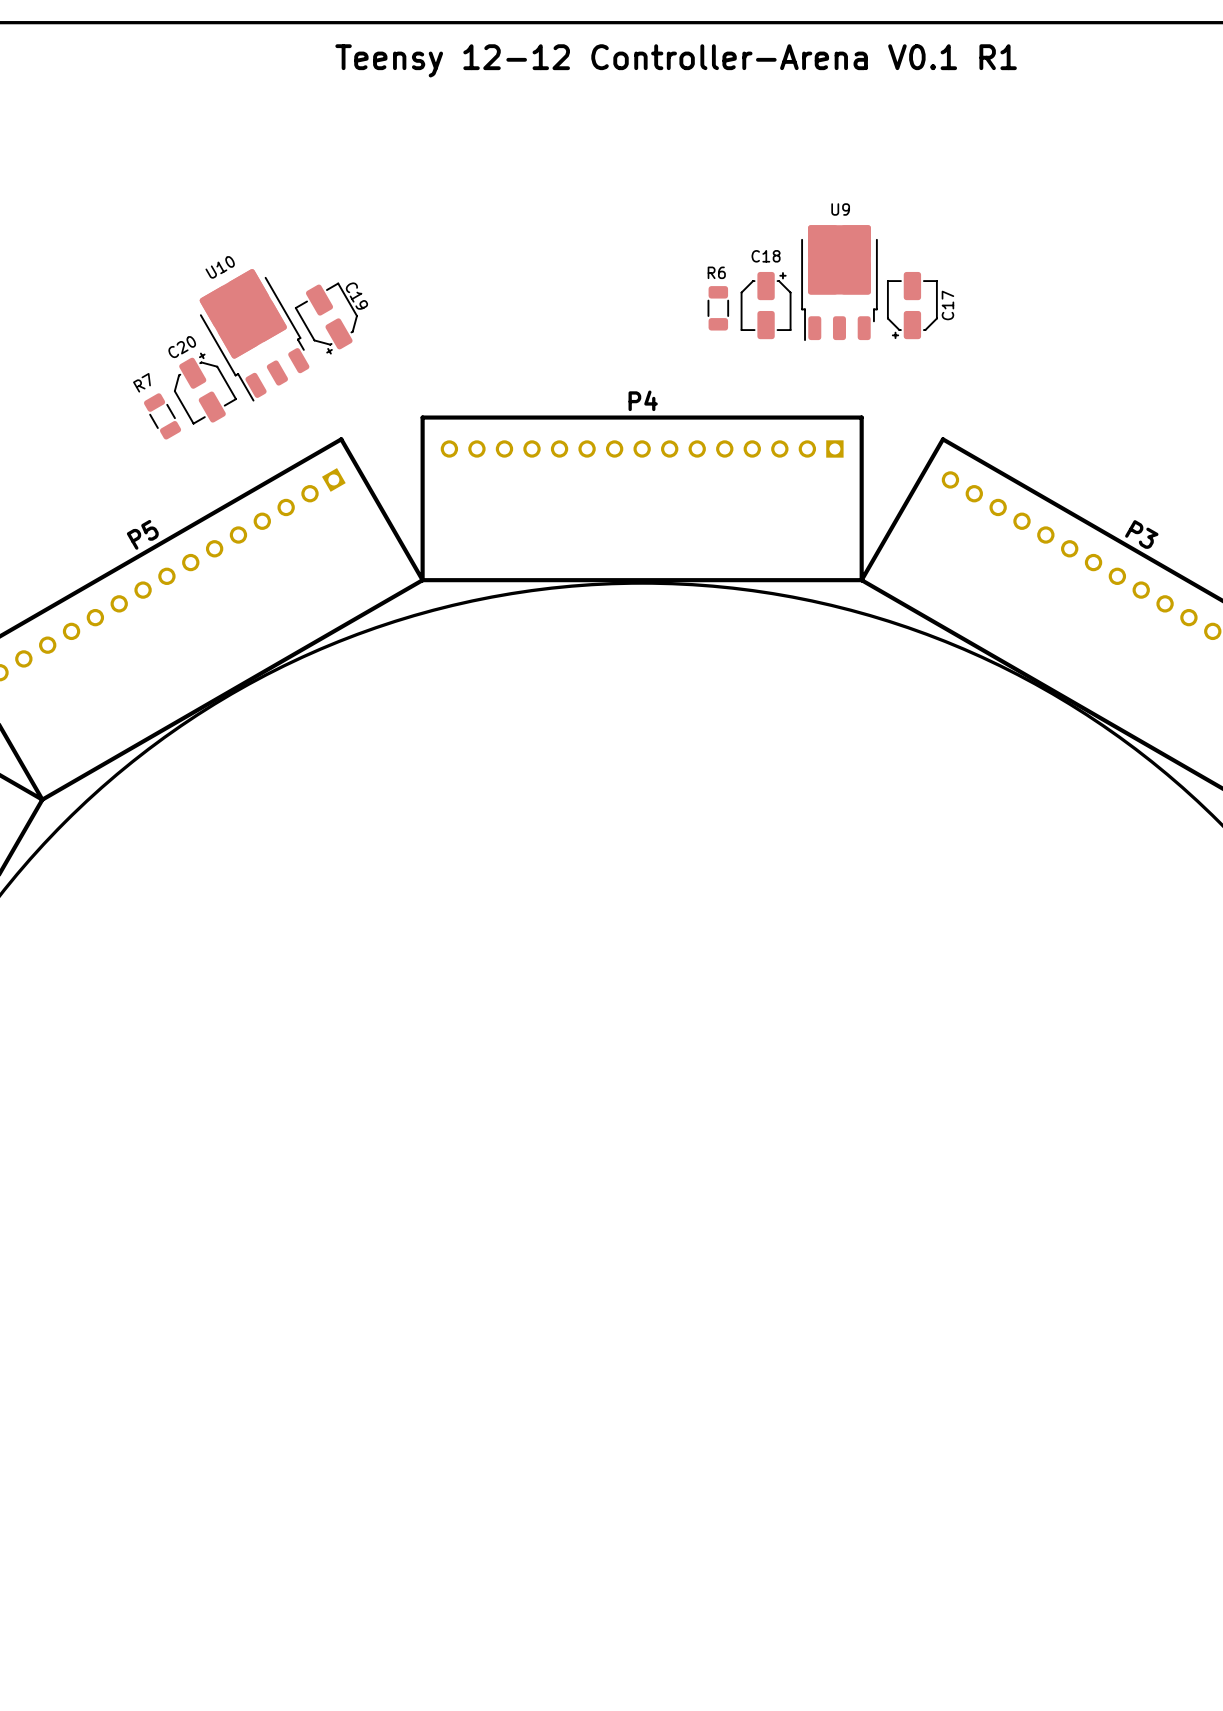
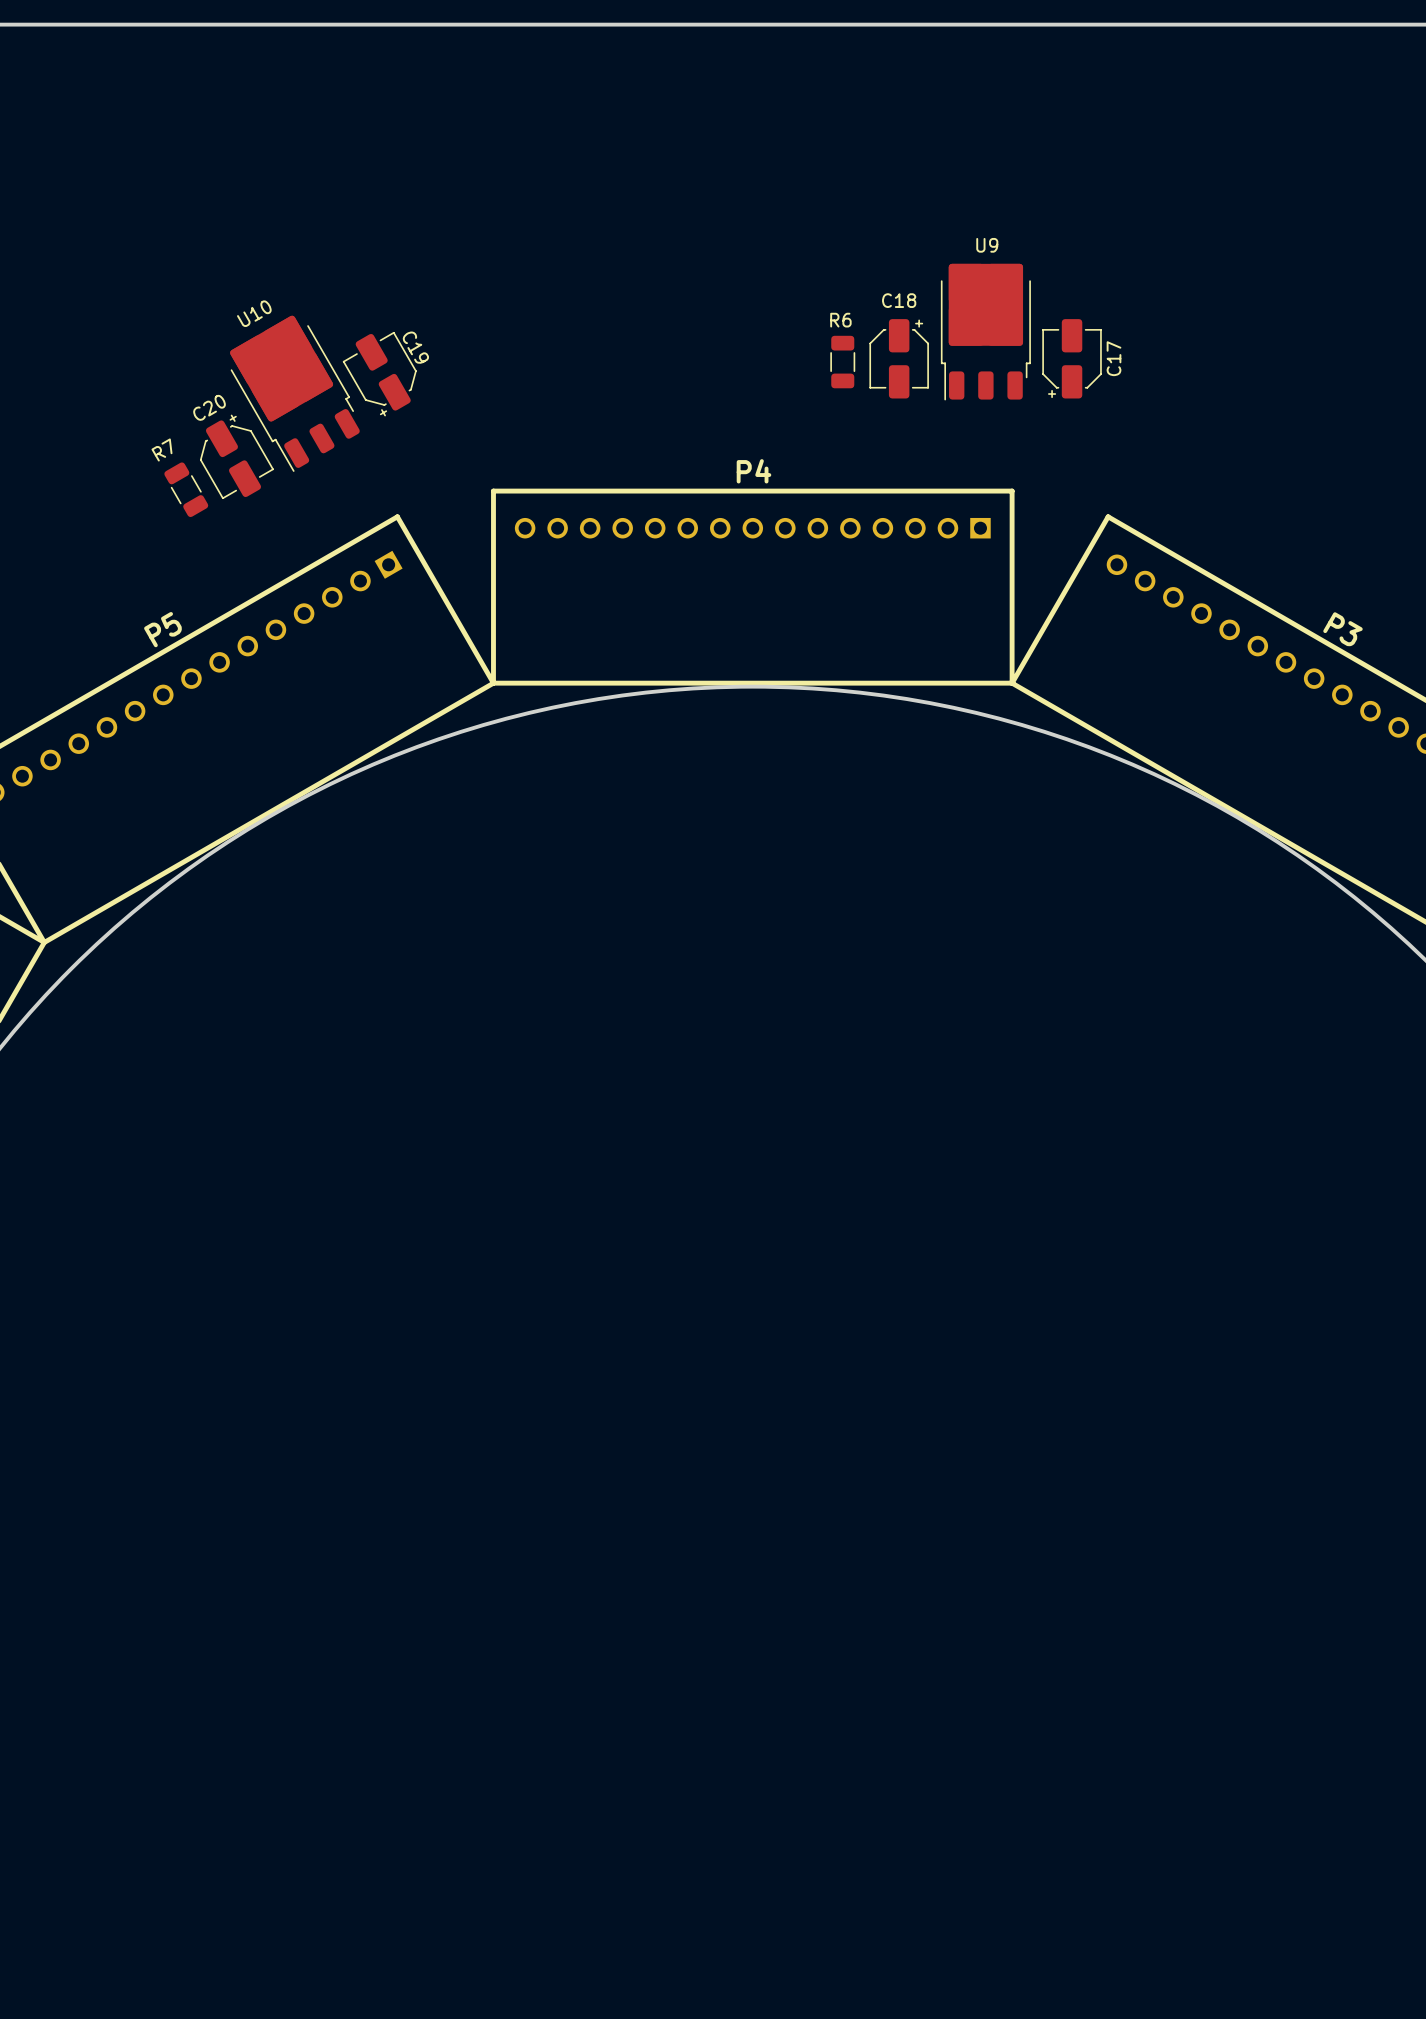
text: Teensy 12-12 Controller-Arena V0.1 R1 (676, 60) -> none

